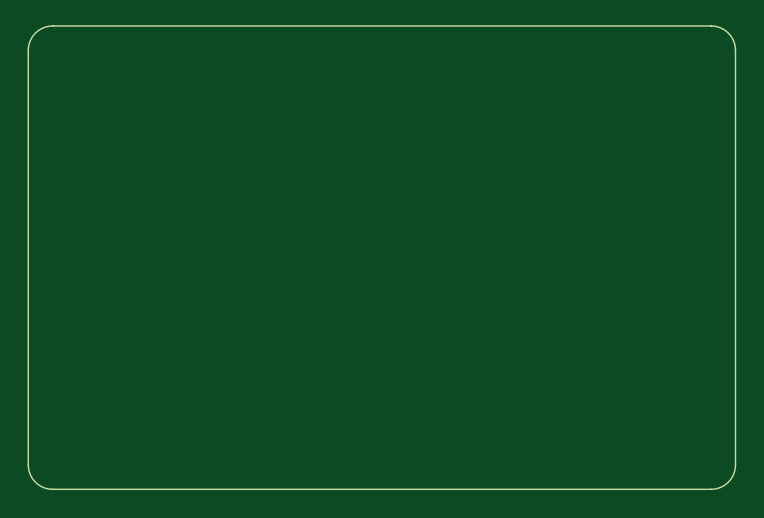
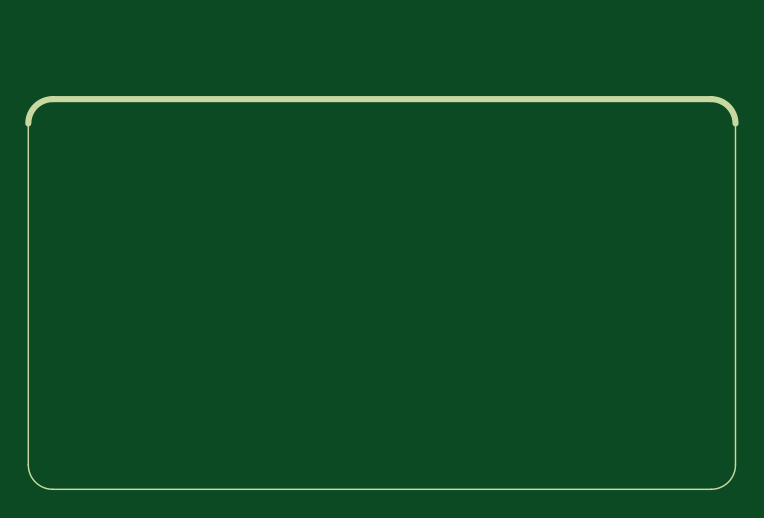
board edge: (735, 123) (734, 44) (725, 31) (711, 25) (49, 26) (37, 31) (29, 44) (28, 123) -> (735, 123) (733, 114) (728, 106) (720, 100) (711, 99) (52, 99) (43, 100) (35, 106) (30, 114) (28, 123)

